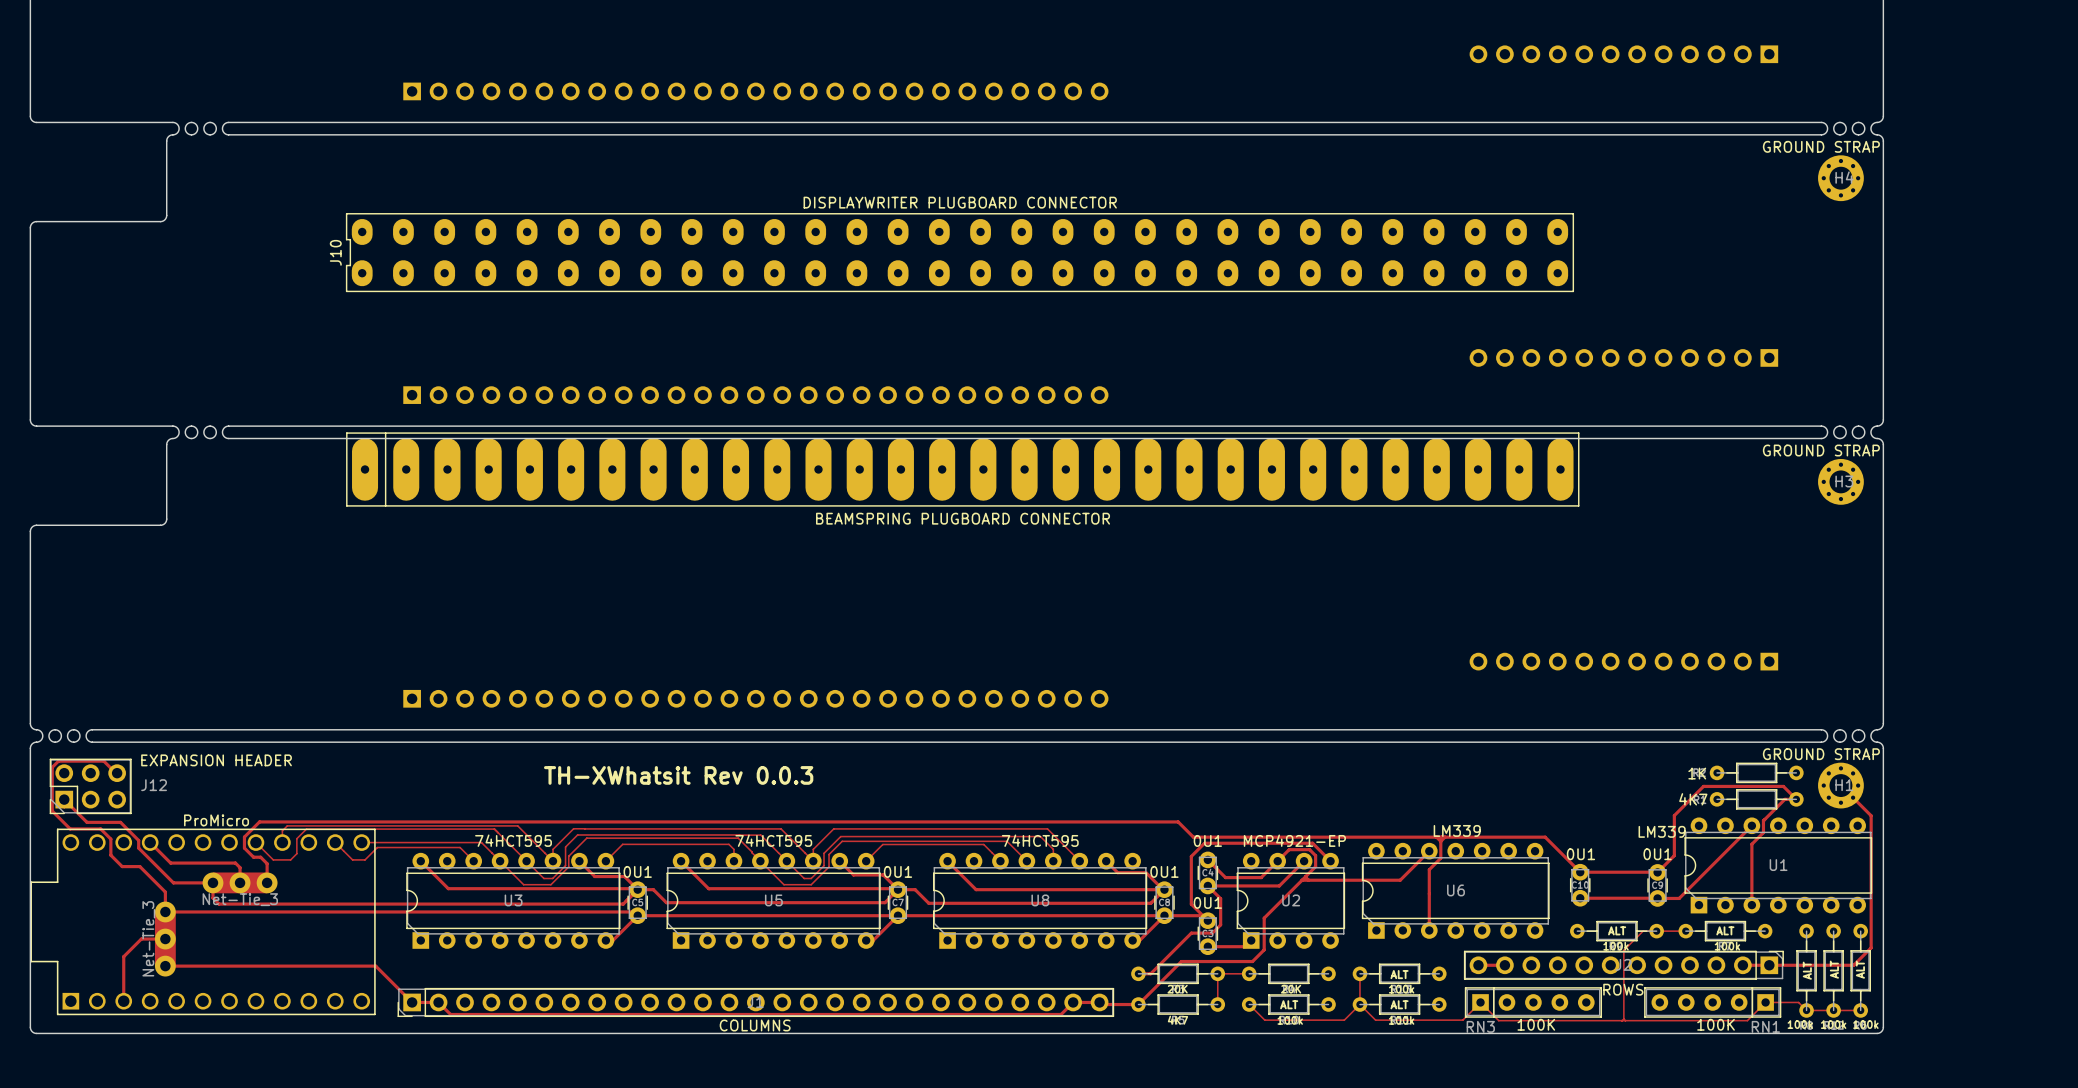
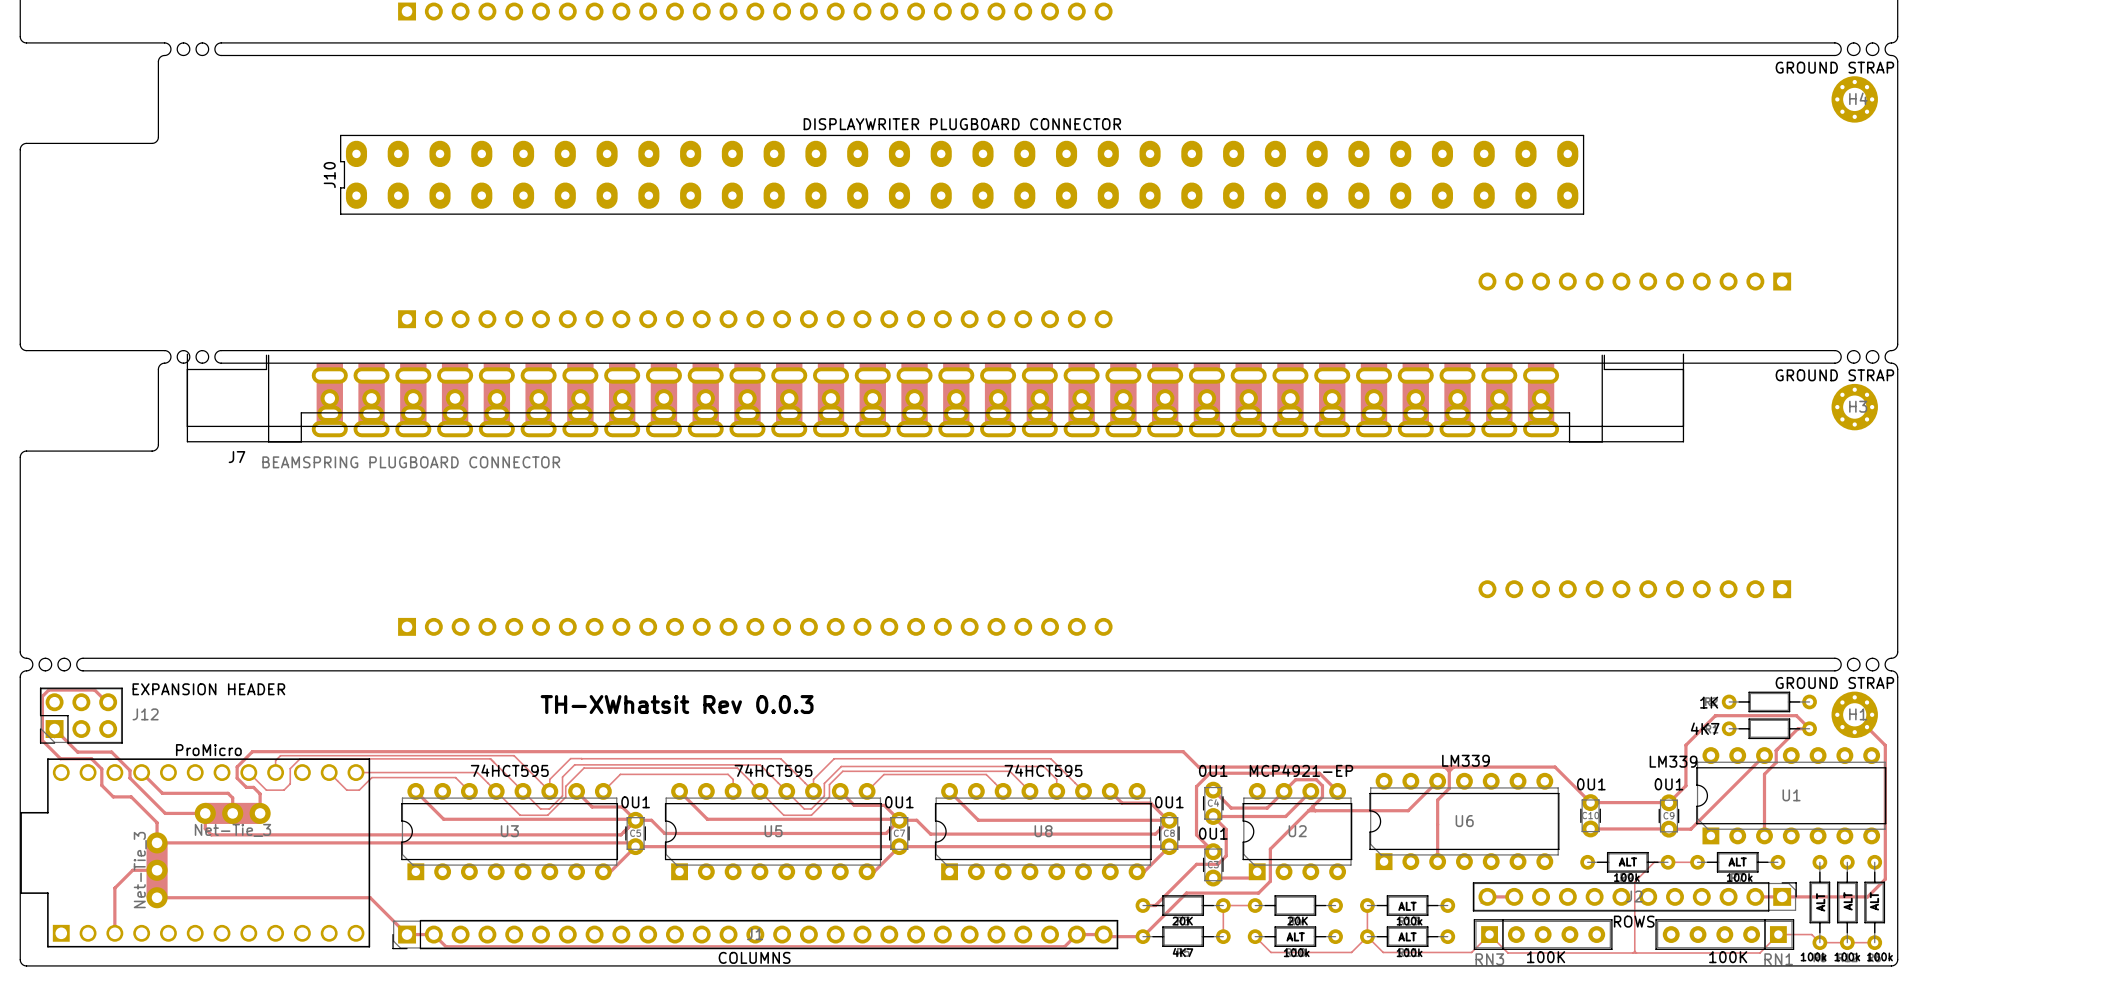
part: BEAMSPRING PLUGBOARD CONNECTOR (962, 469) -> none
J7: none -> BEAMSPRING PLUGBOARD CONNECTOR (935, 397)

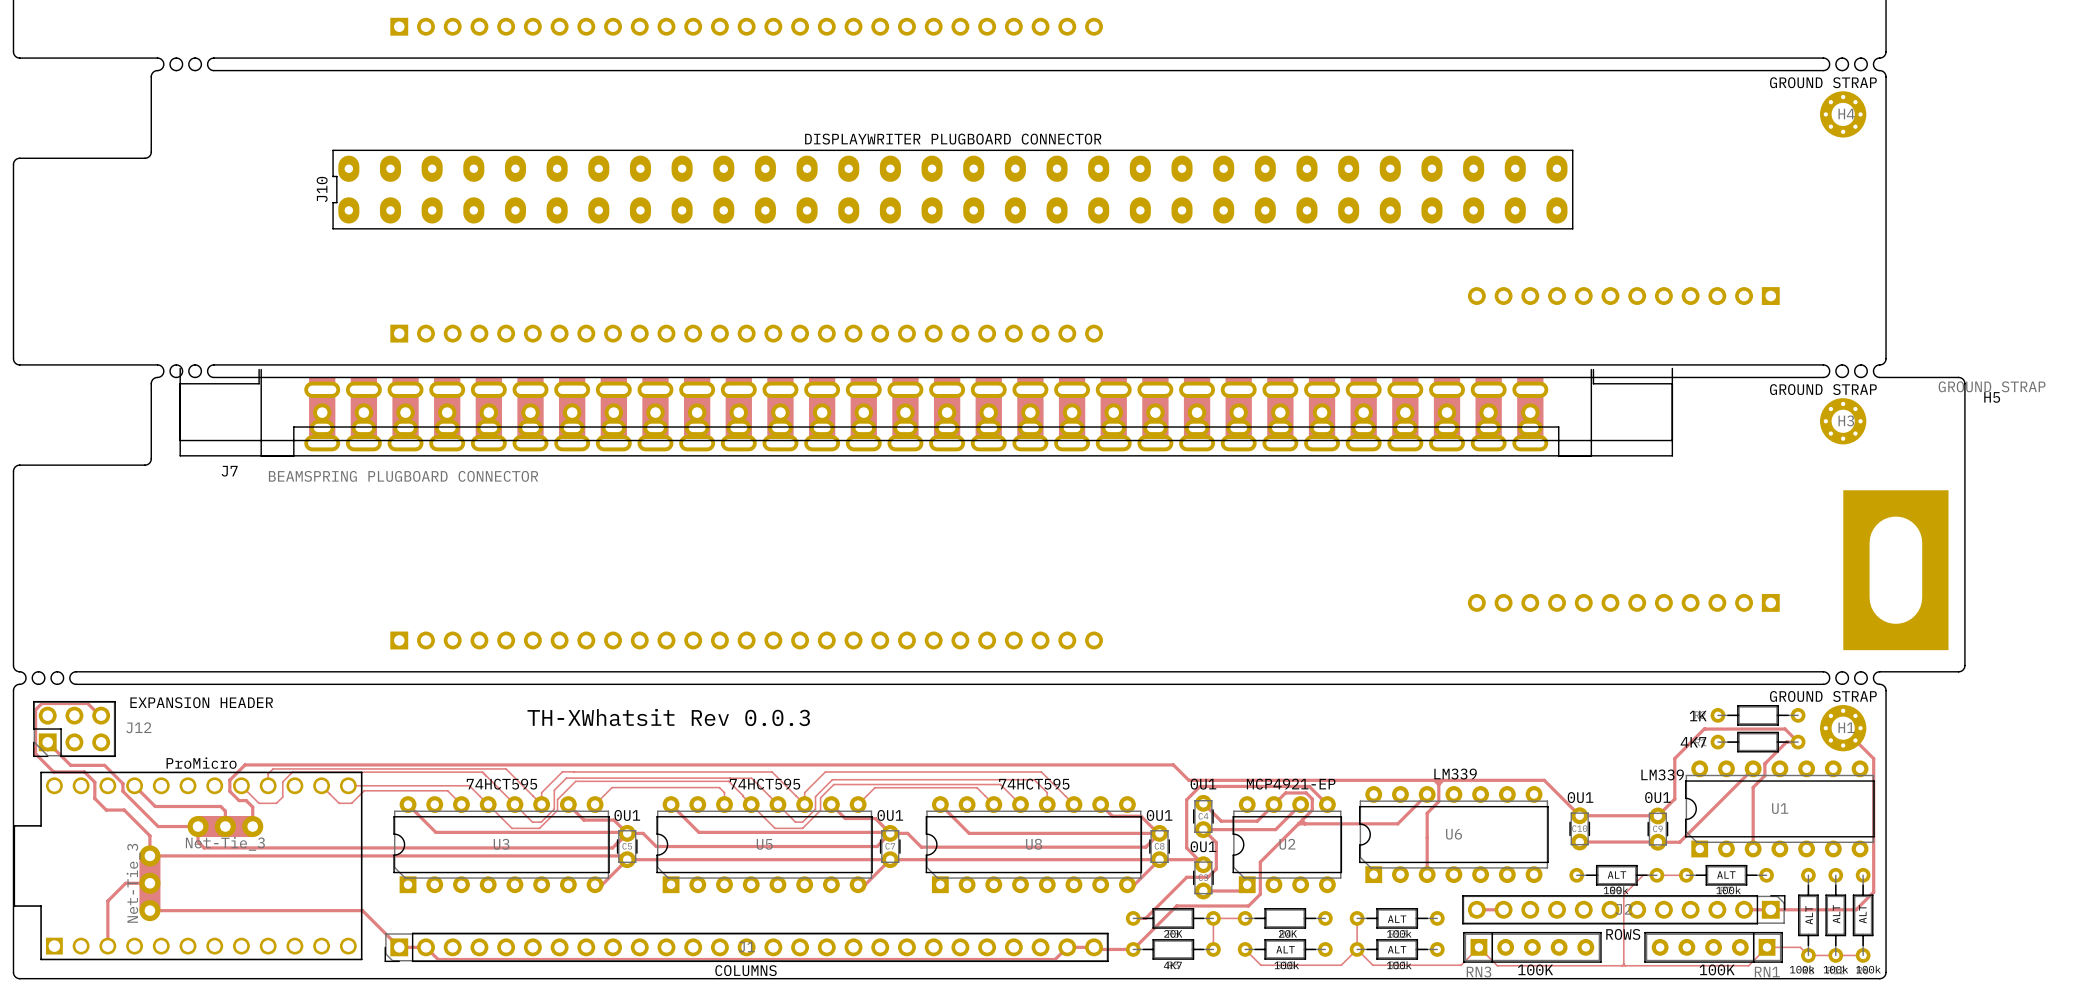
board edge: (1891, 363) (1895, 365) (1897, 369) (1897, 652) (1895, 656) (1891, 658) -> (1879, 377) (1959, 377) (1963, 379) (1964, 383) (1964, 667) (1958, 671) (1879, 671)
H5: none -> GROUND STRAP (1895, 570)

